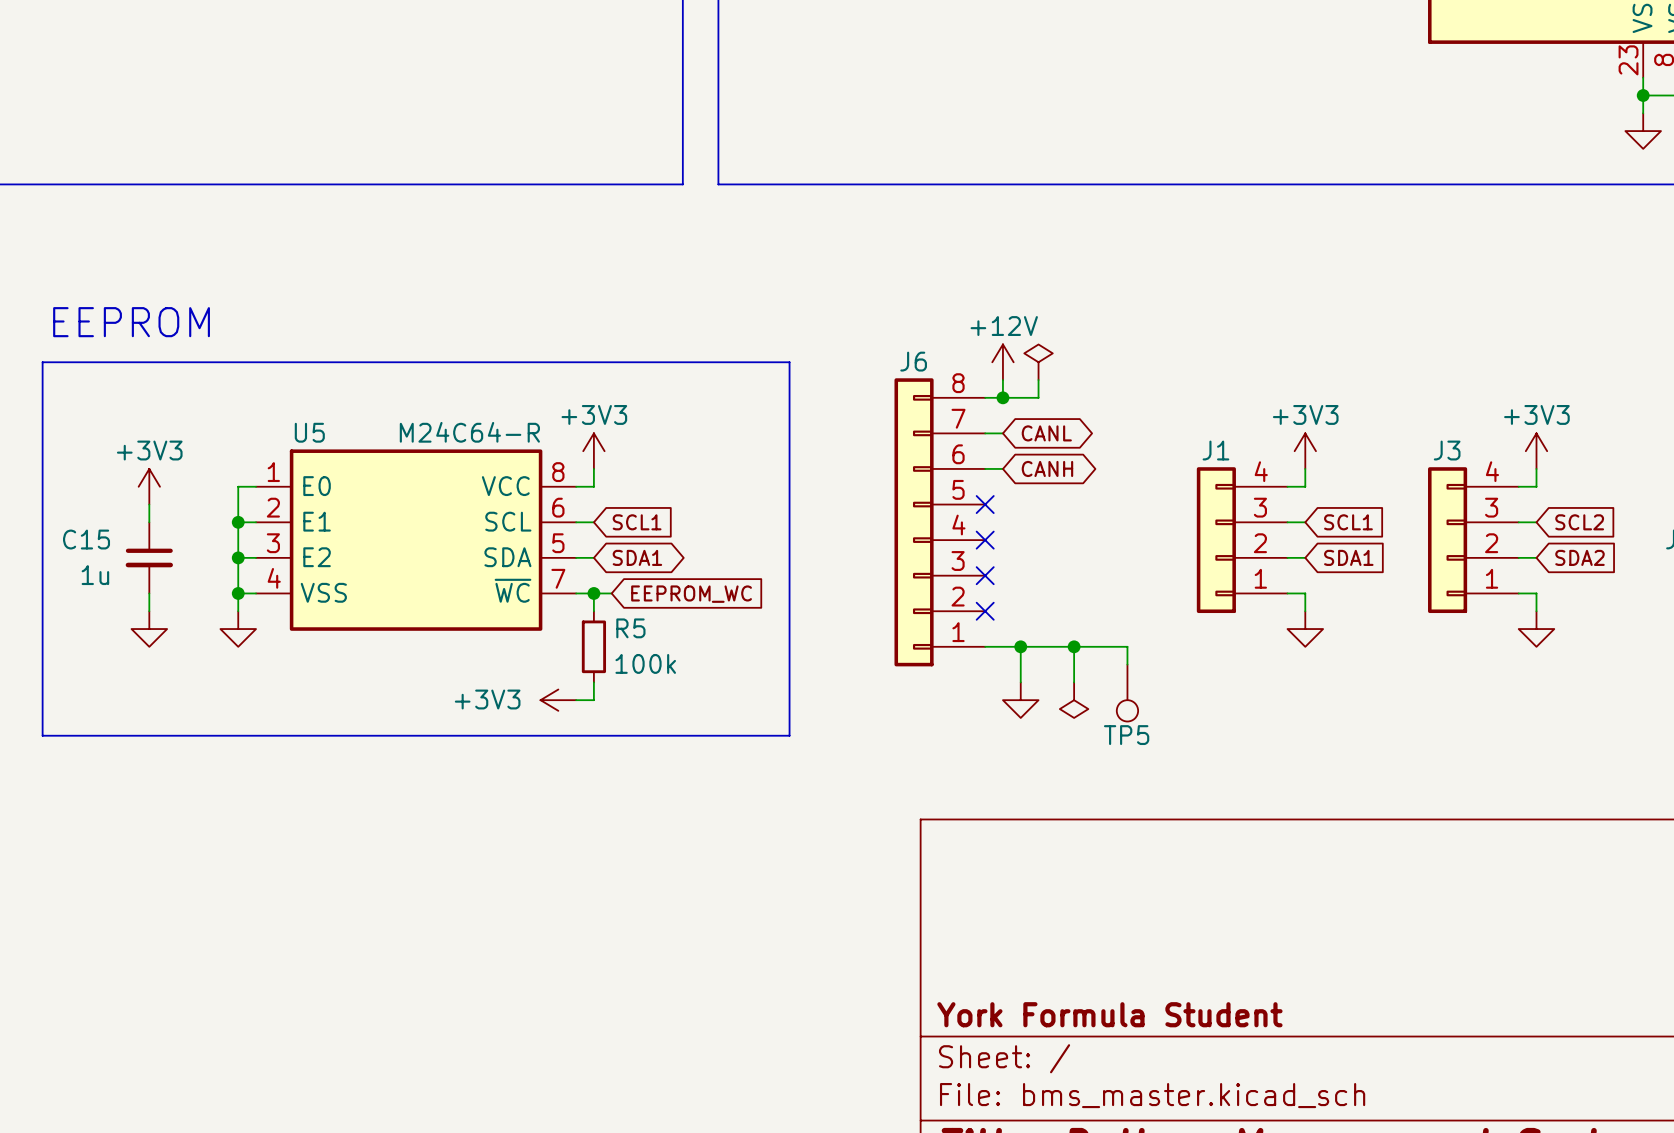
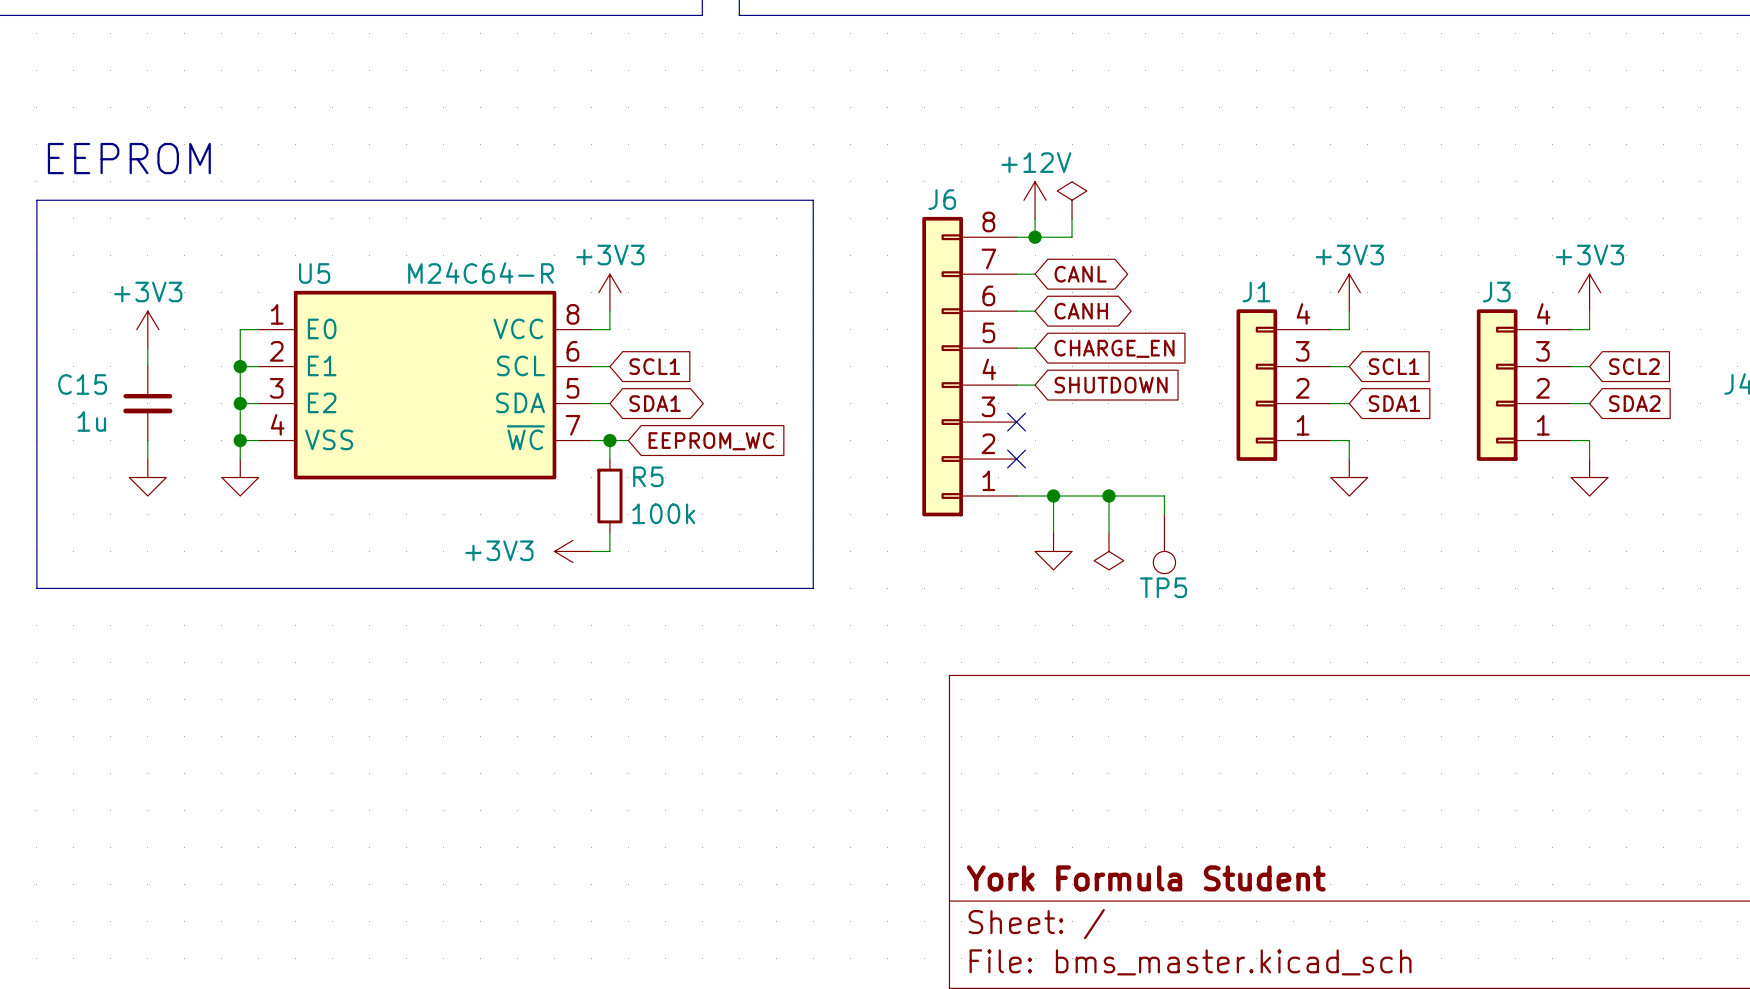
wire: none -> (1016, 348) (1035, 348)
no-connect mark: (985, 504) -> none
global label: none -> CHARGE_EN (1114, 348)
wire: none -> (1016, 385) (1035, 385)
no-connect mark: (985, 540) -> none
global label: none -> SHUTDOWN (1111, 385)

